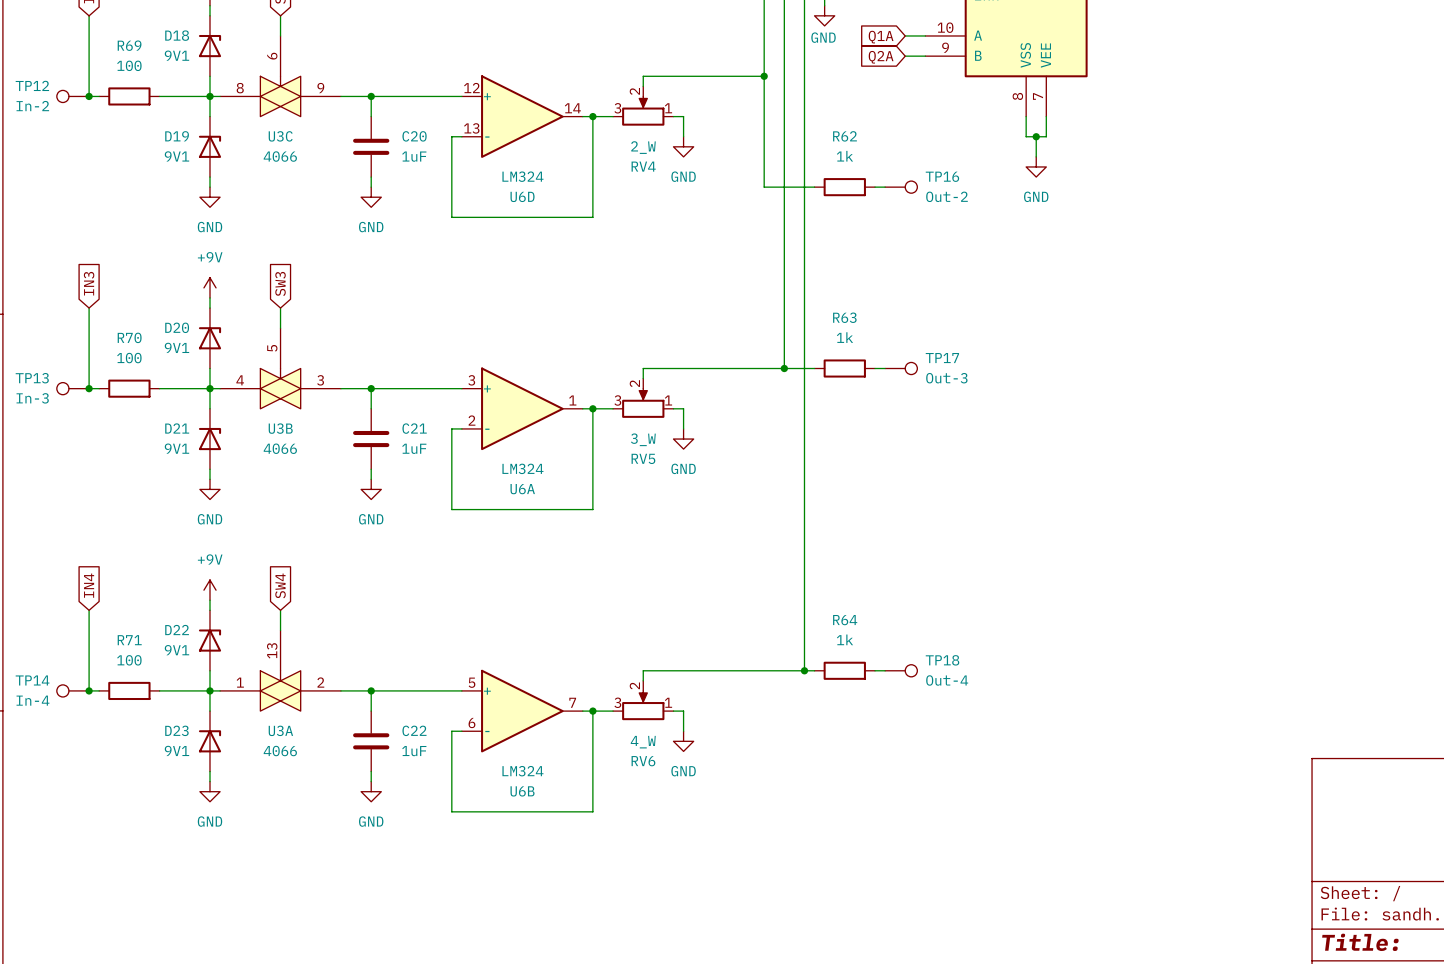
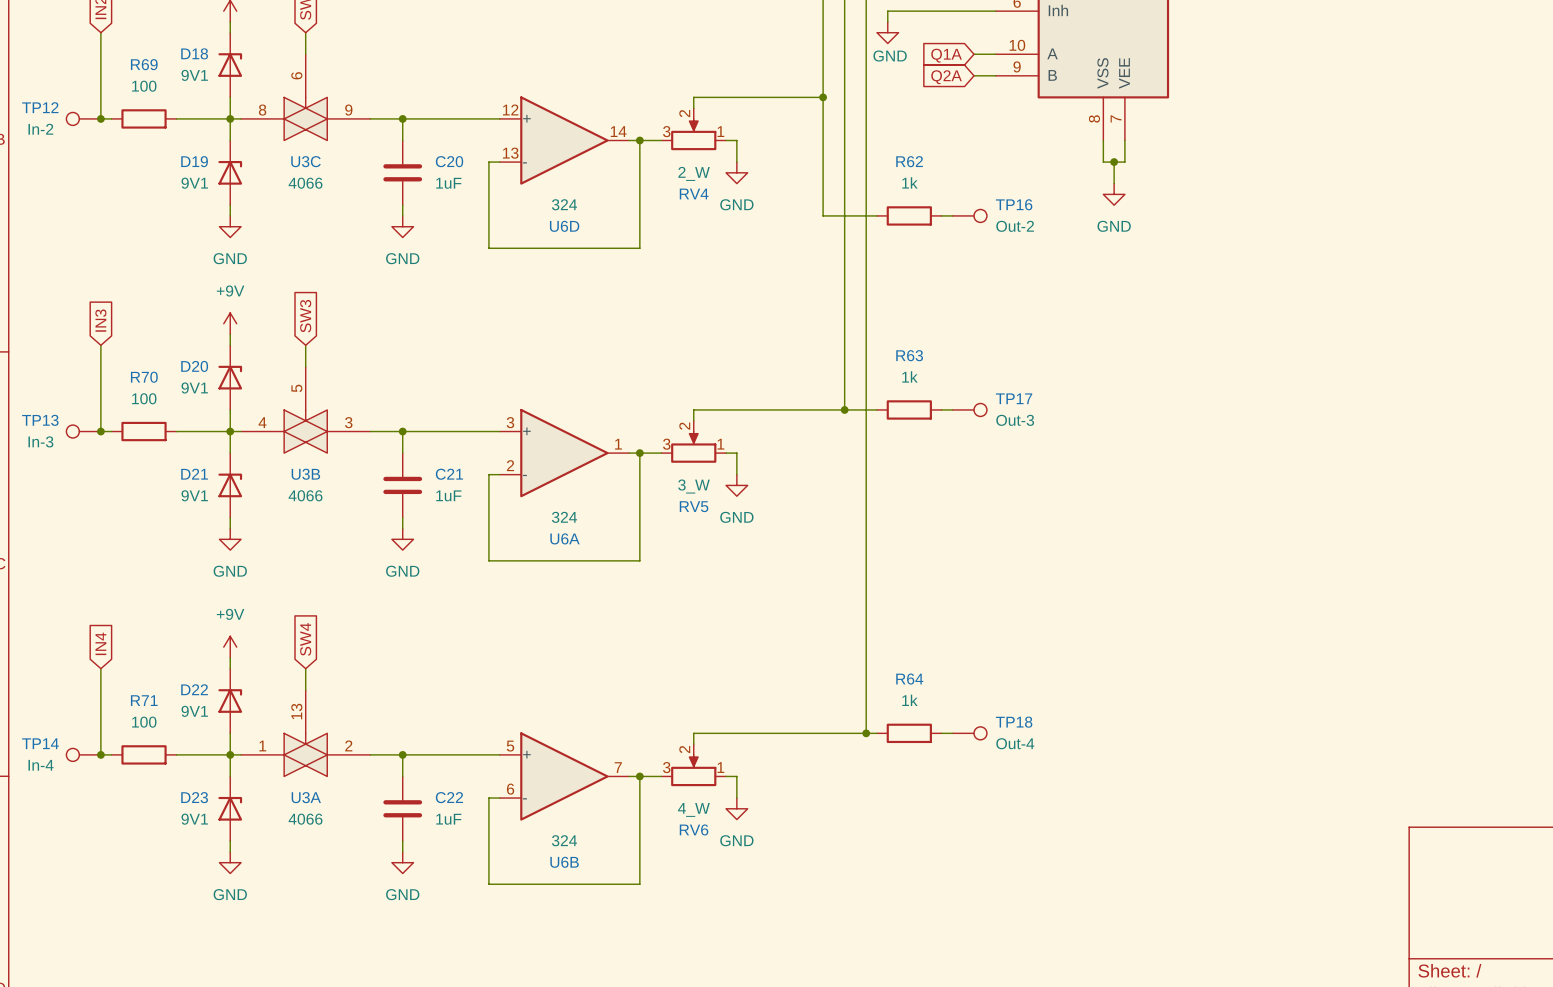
U6D value: LM324 (522, 176) -> 324 (564, 204)
U6A value: LM324 (522, 468) -> 324 (564, 517)
U6B value: LM324 (522, 771) -> 324 (564, 840)

